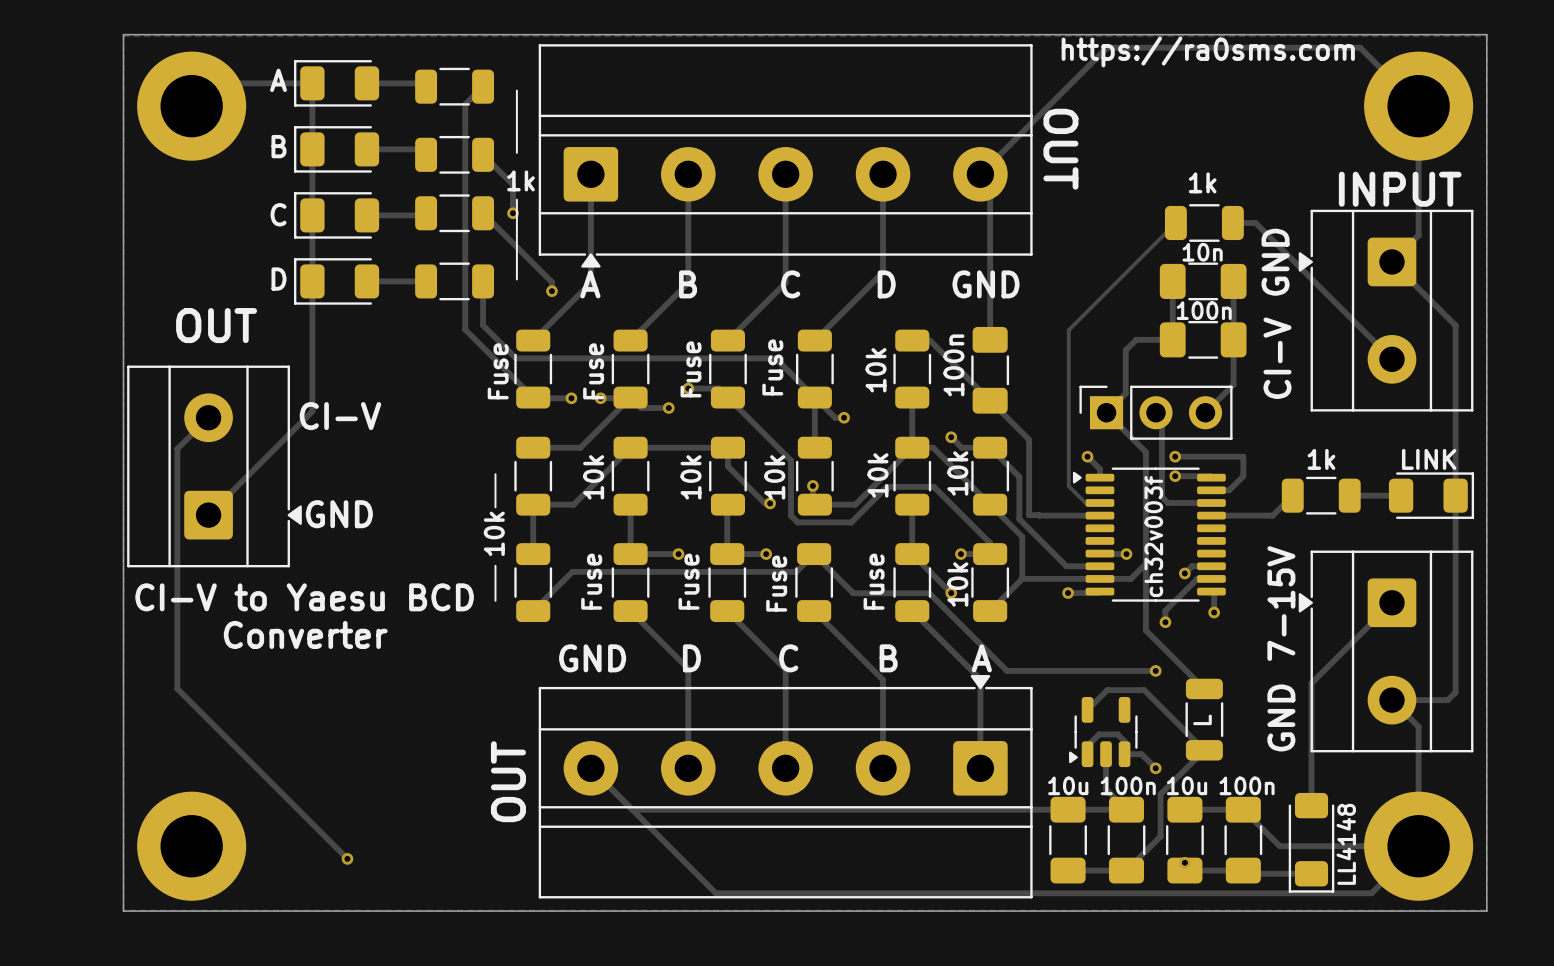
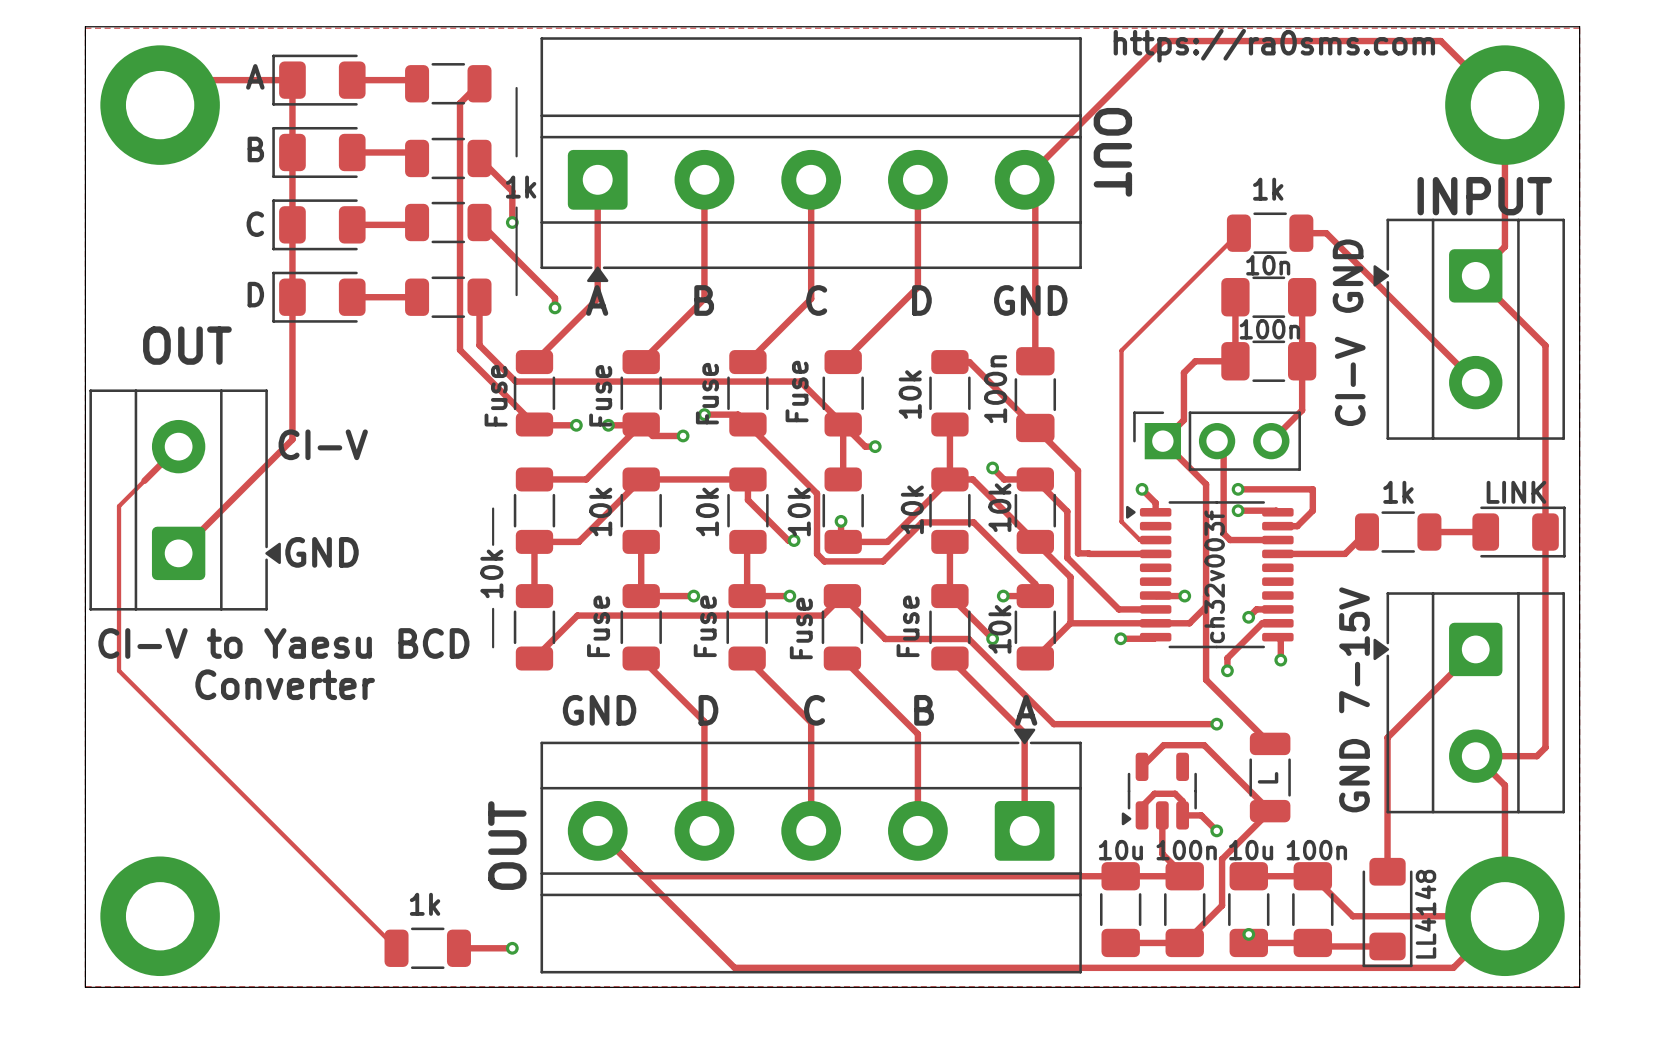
track: (177, 448) (177, 688) (347, 858) -> (144, 480) (119, 506) (119, 670) (396, 948)
text: none -> 1k (425, 904)
via: (347, 858) -> none
part: none -> (427, 948)
track: none -> (458, 948) (512, 948)
via: none -> (512, 948)

